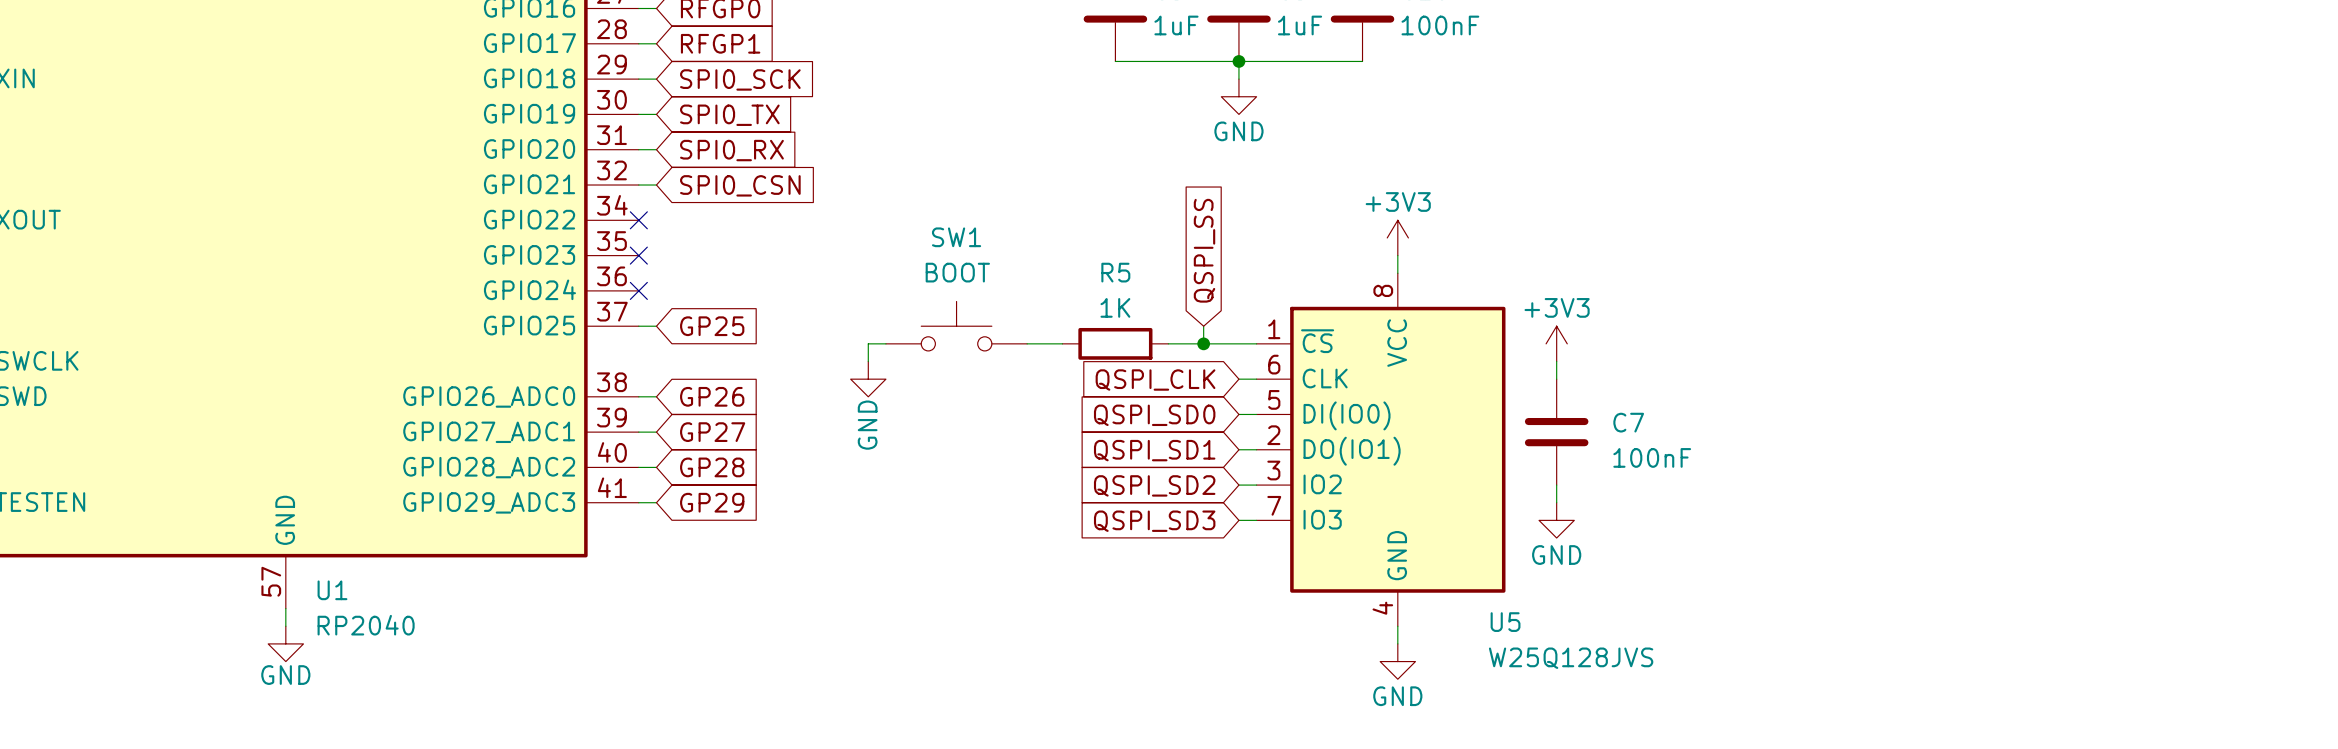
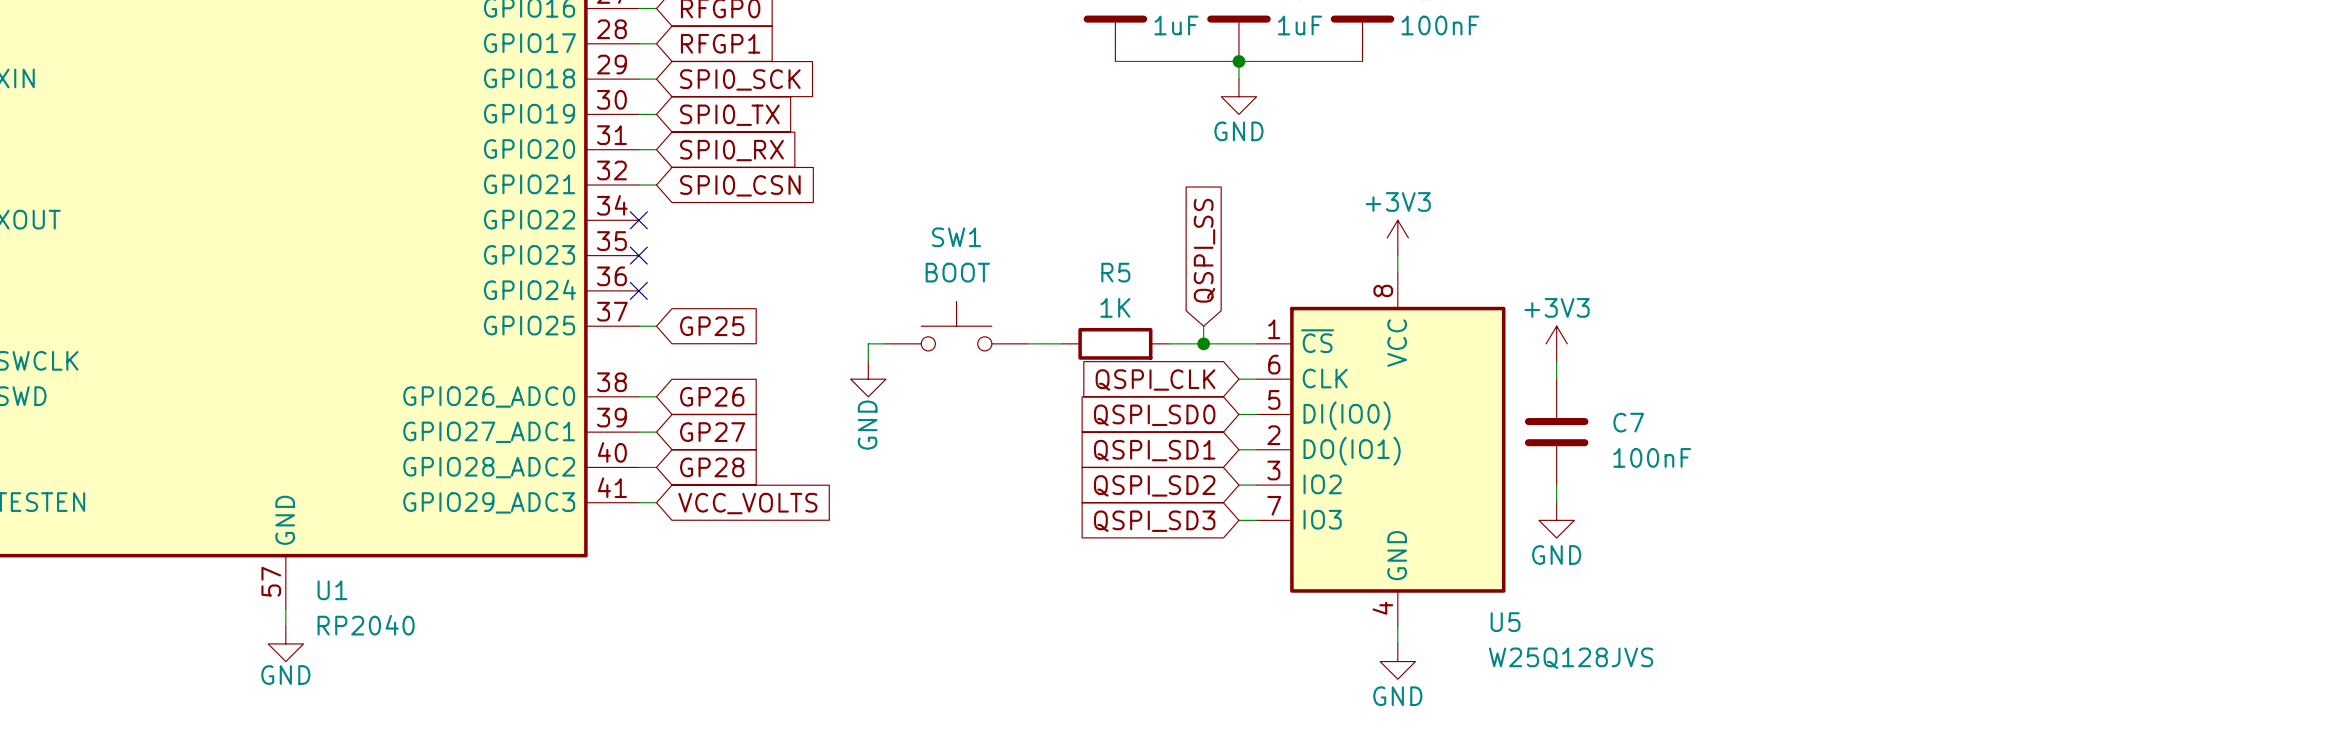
global label: GP29 (712, 502) -> VCC_VOLTS (747, 503)

